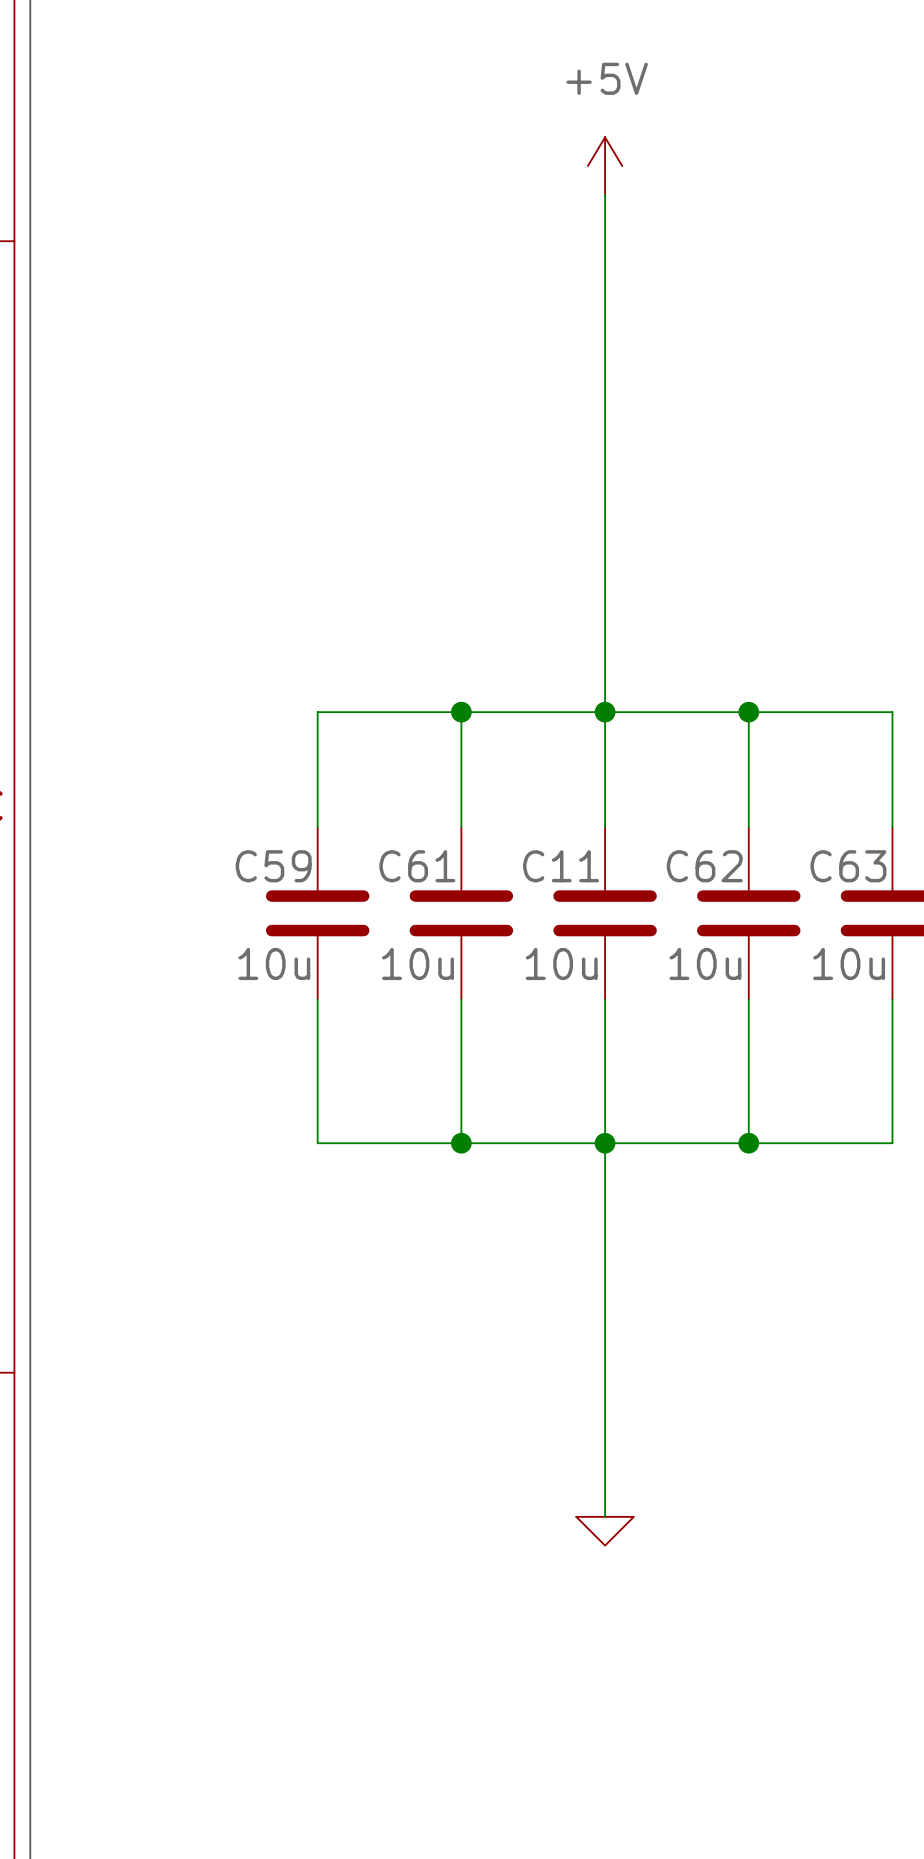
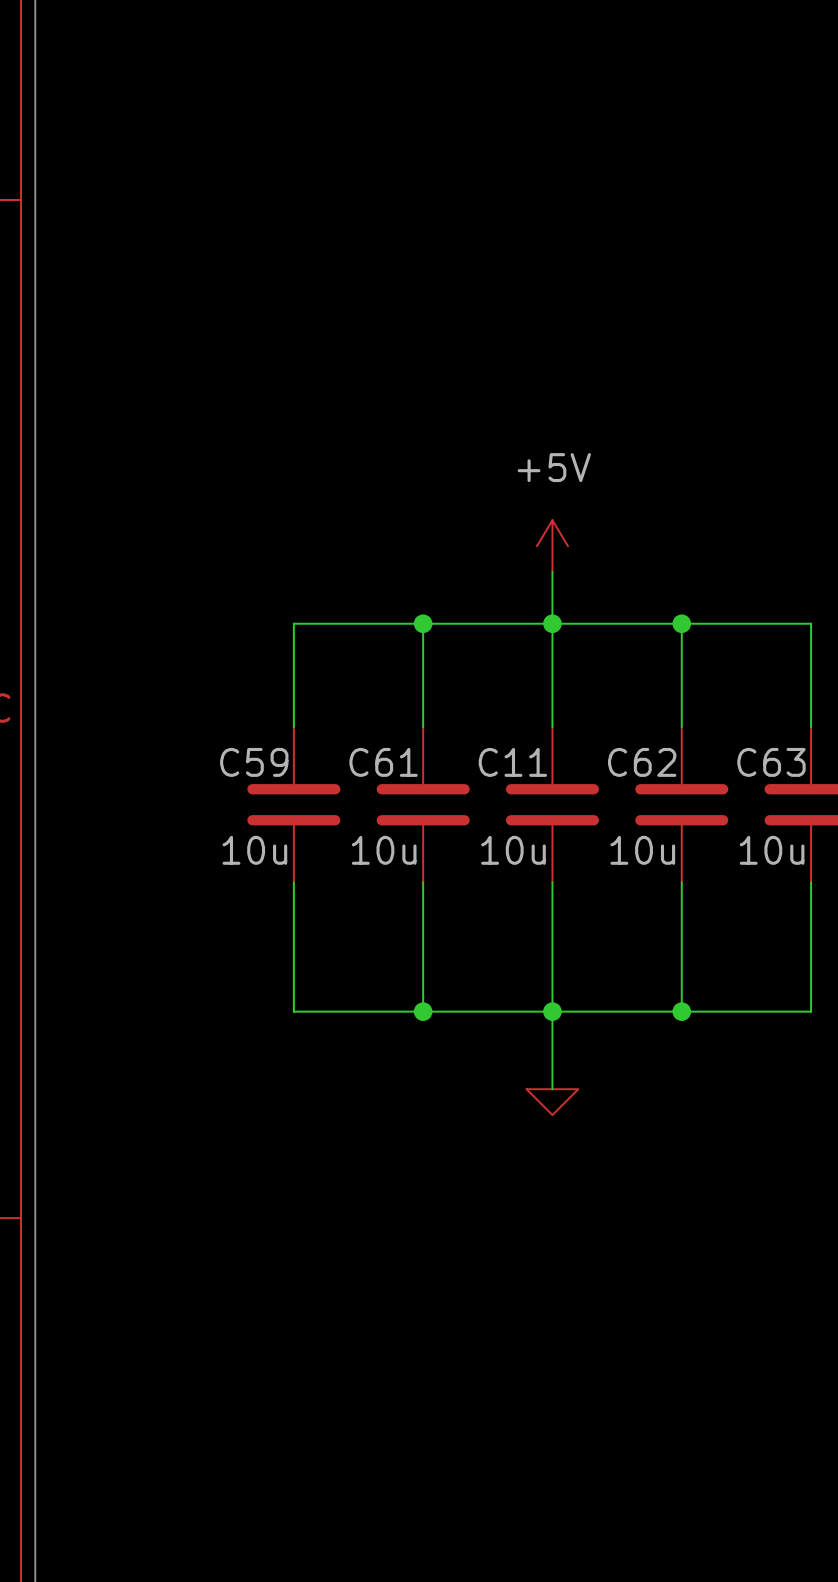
power symbol position: +5V (605, 166) -> +5V (552, 546)
wire: (605, 194) (605, 654) -> none
wire: (605, 1229) (605, 1516) -> none
power symbol position: (605, 1531) -> (552, 1102)

